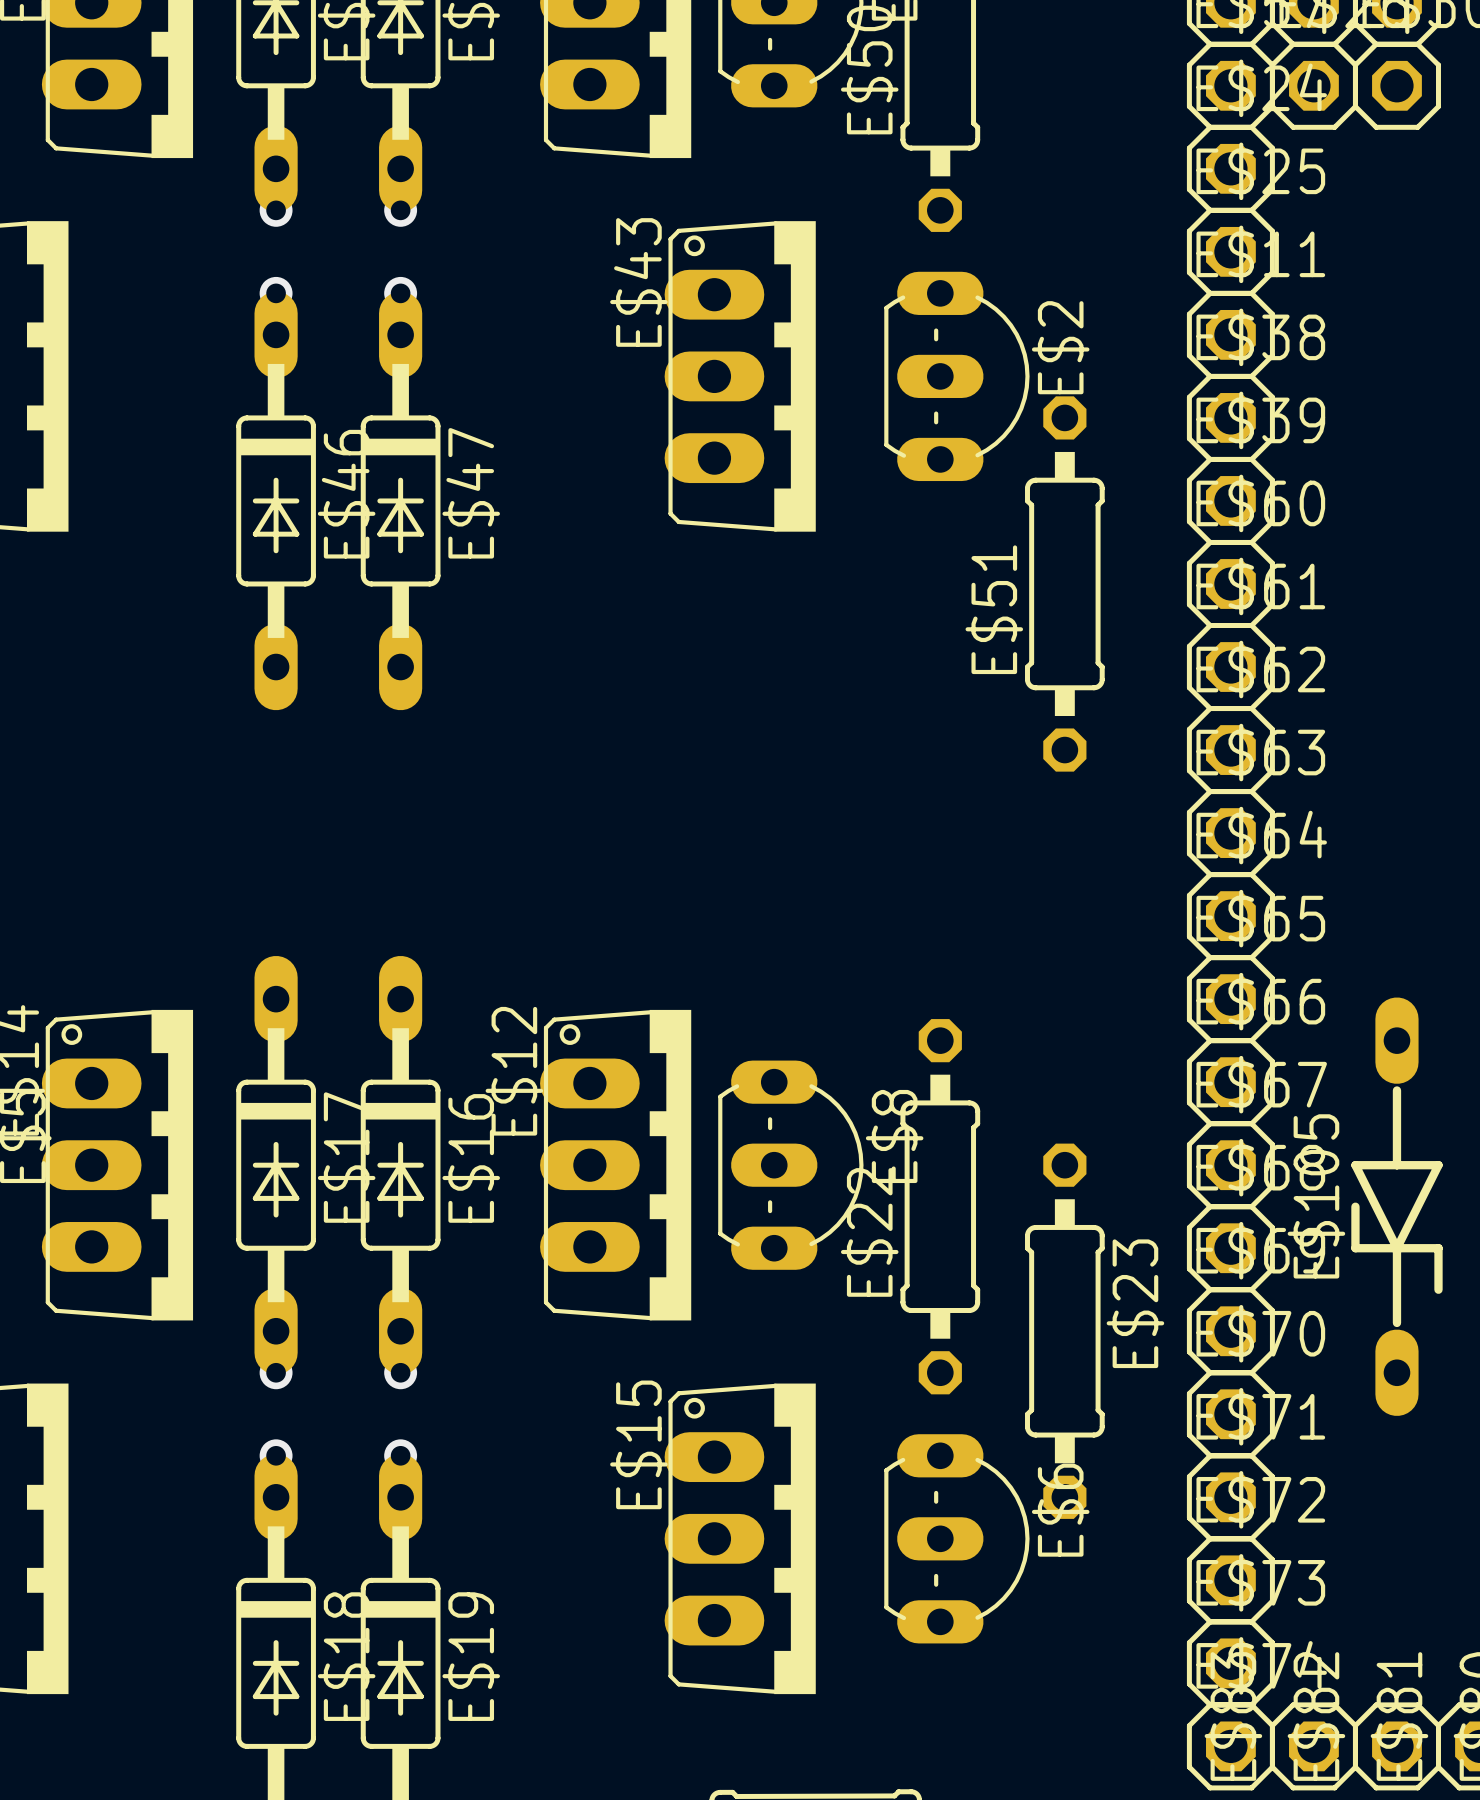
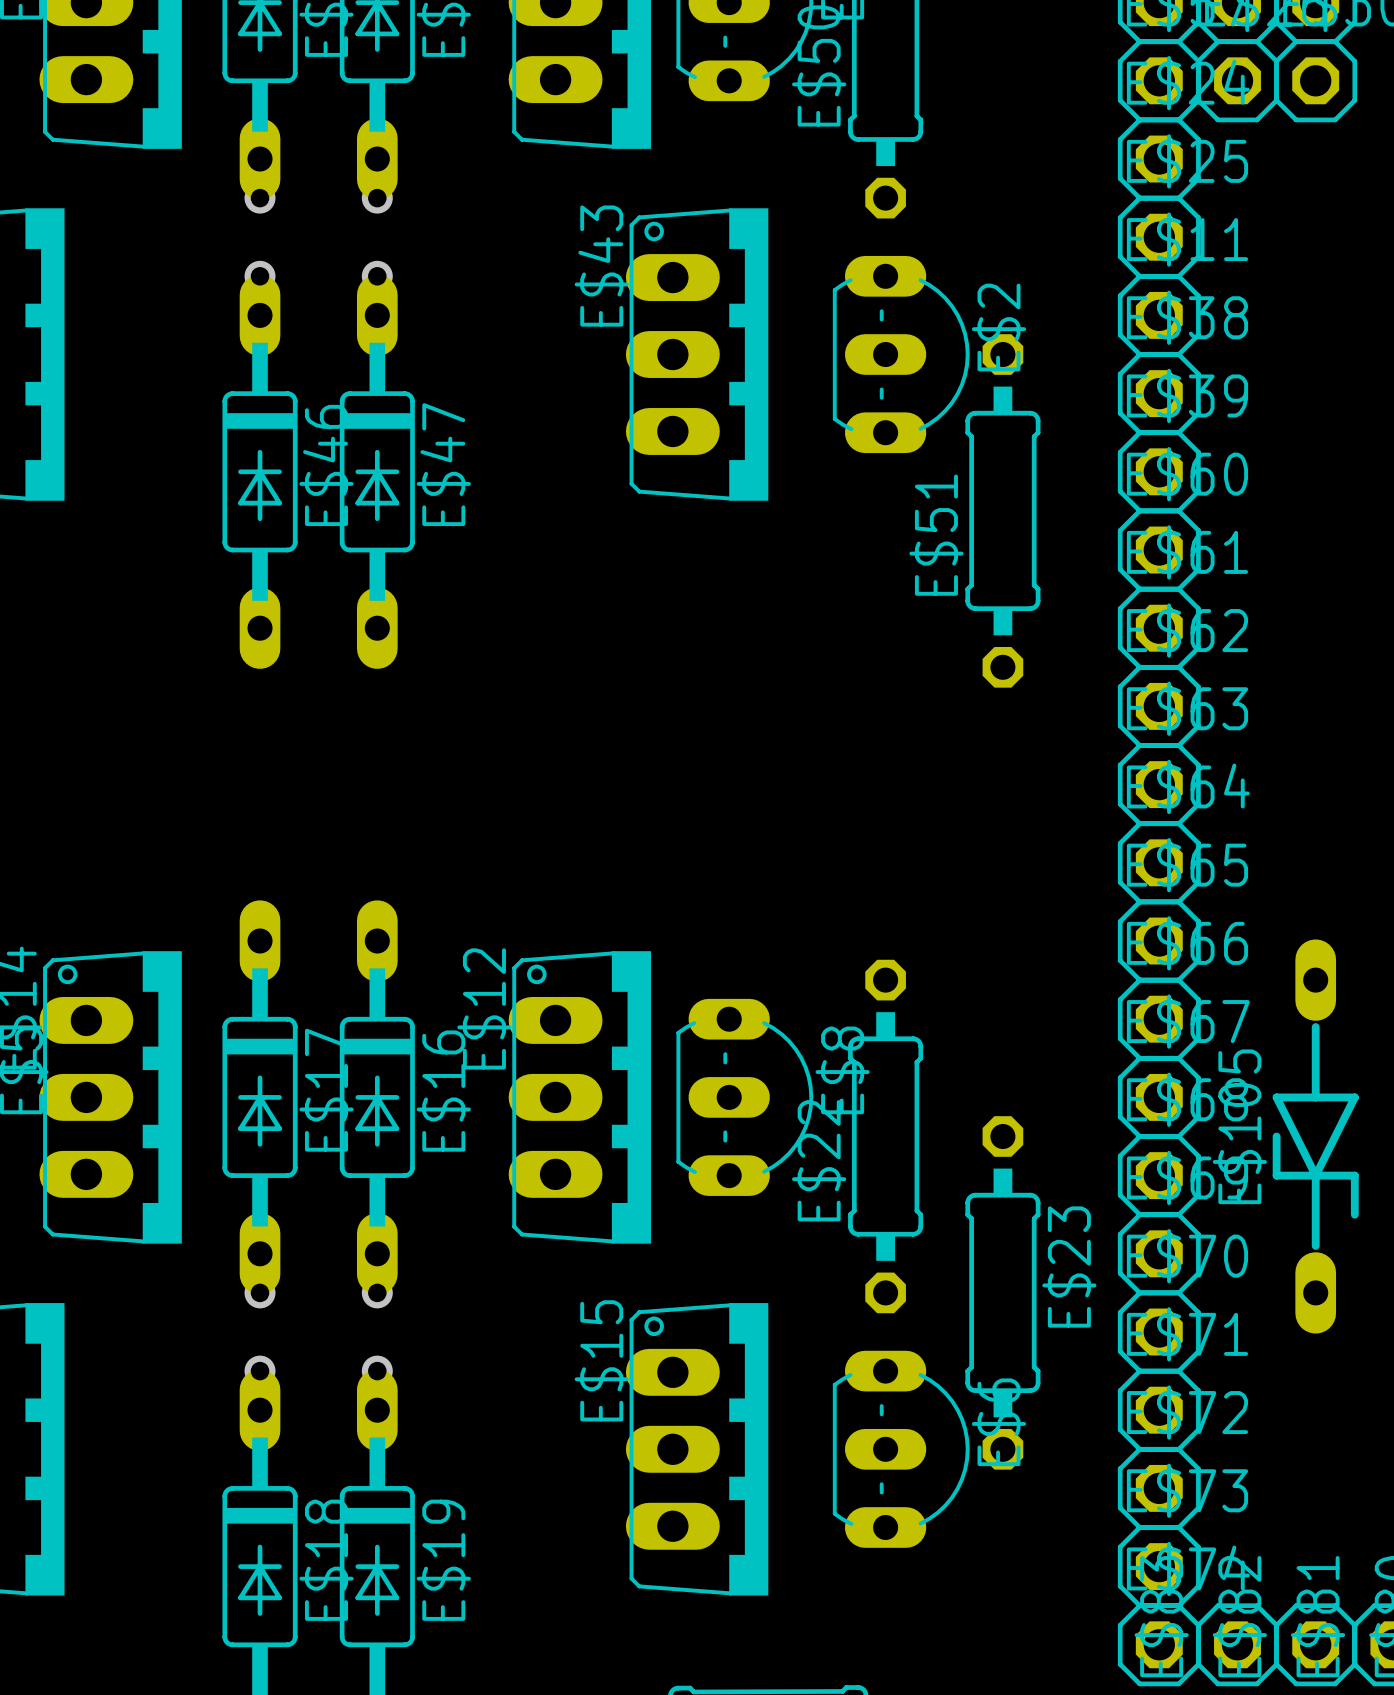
E$51 position: (1064, 583) -> (1002, 510)
E$23 position: (1064, 1331) -> (1002, 1292)

